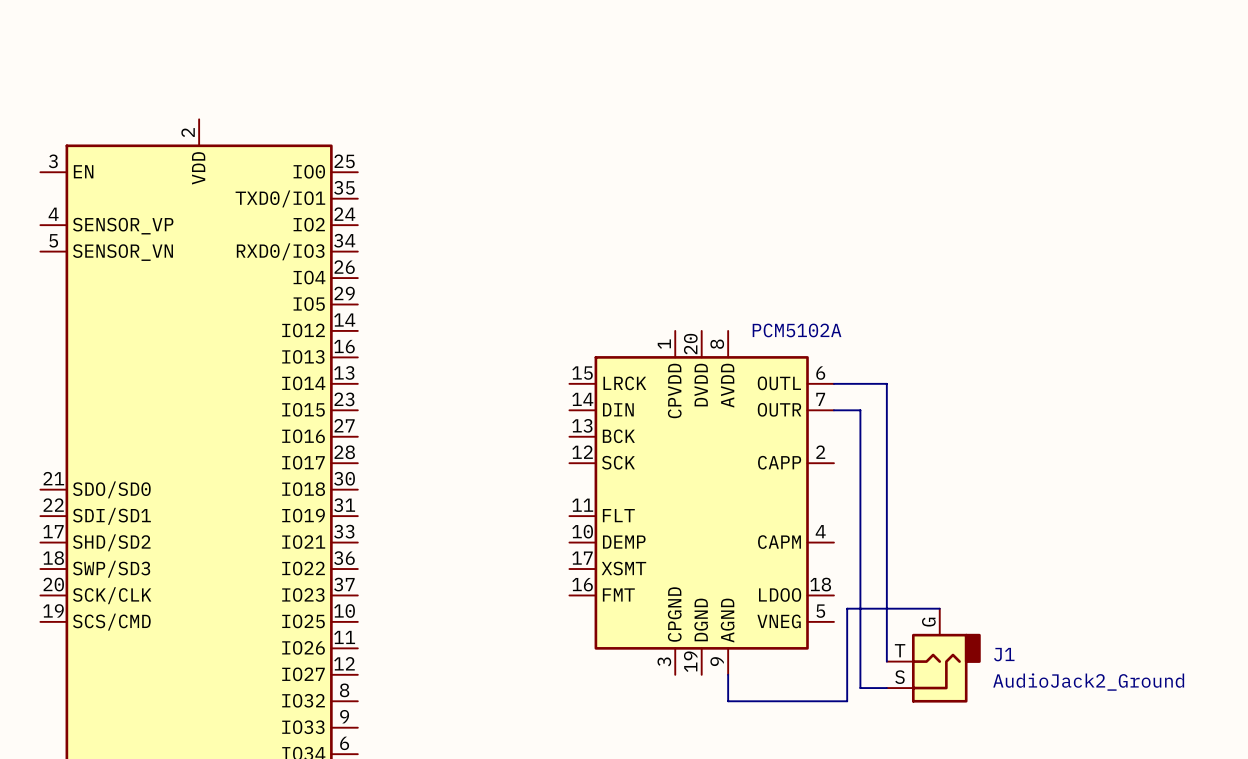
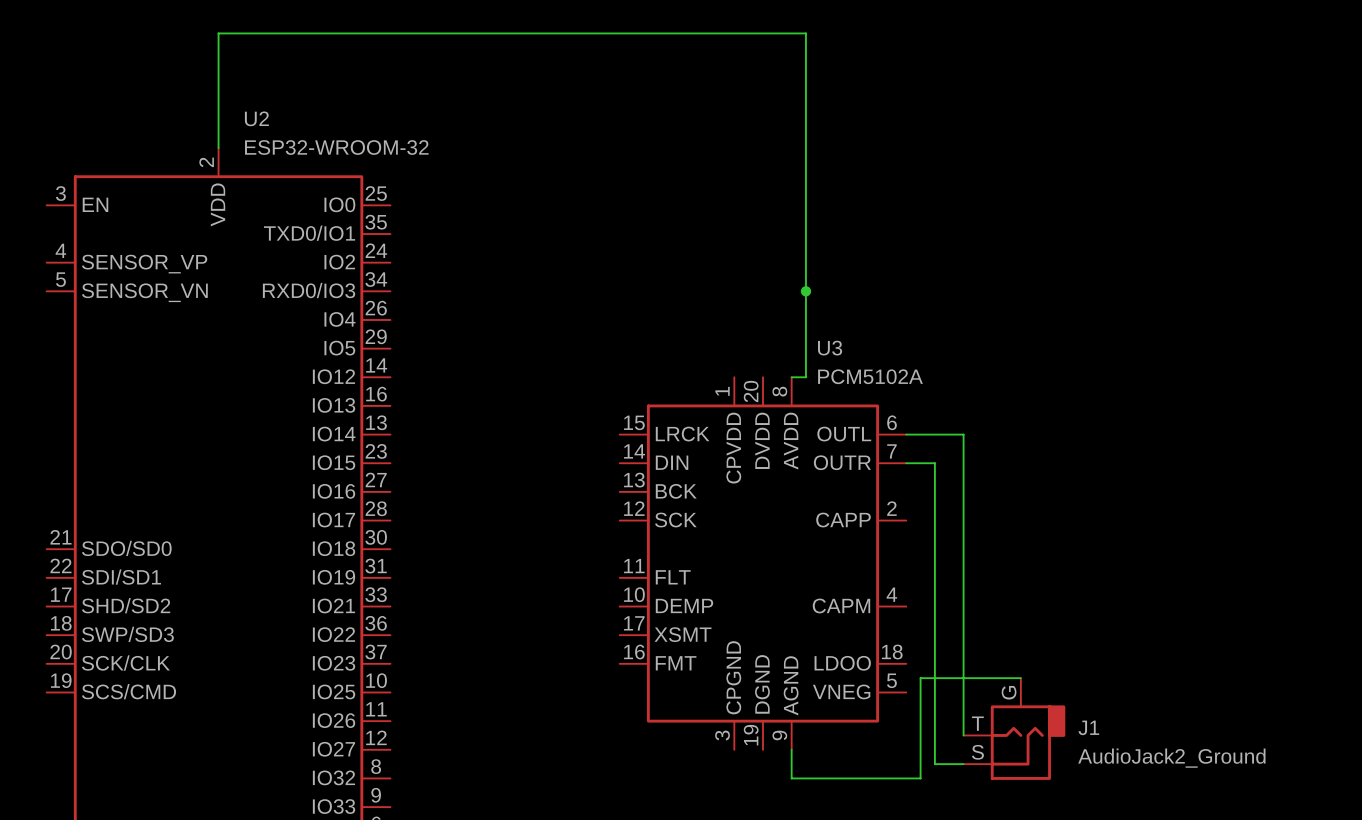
U2 name: none -> U2 (256, 118)
U2 value: none -> ESP32-WROOM-32 (336, 147)
wire: none -> (218, 148) (218, 33) (805, 33) (805, 377) (791, 377)
junction: none -> (805, 291)
U3 name: none -> U3 (830, 348)

